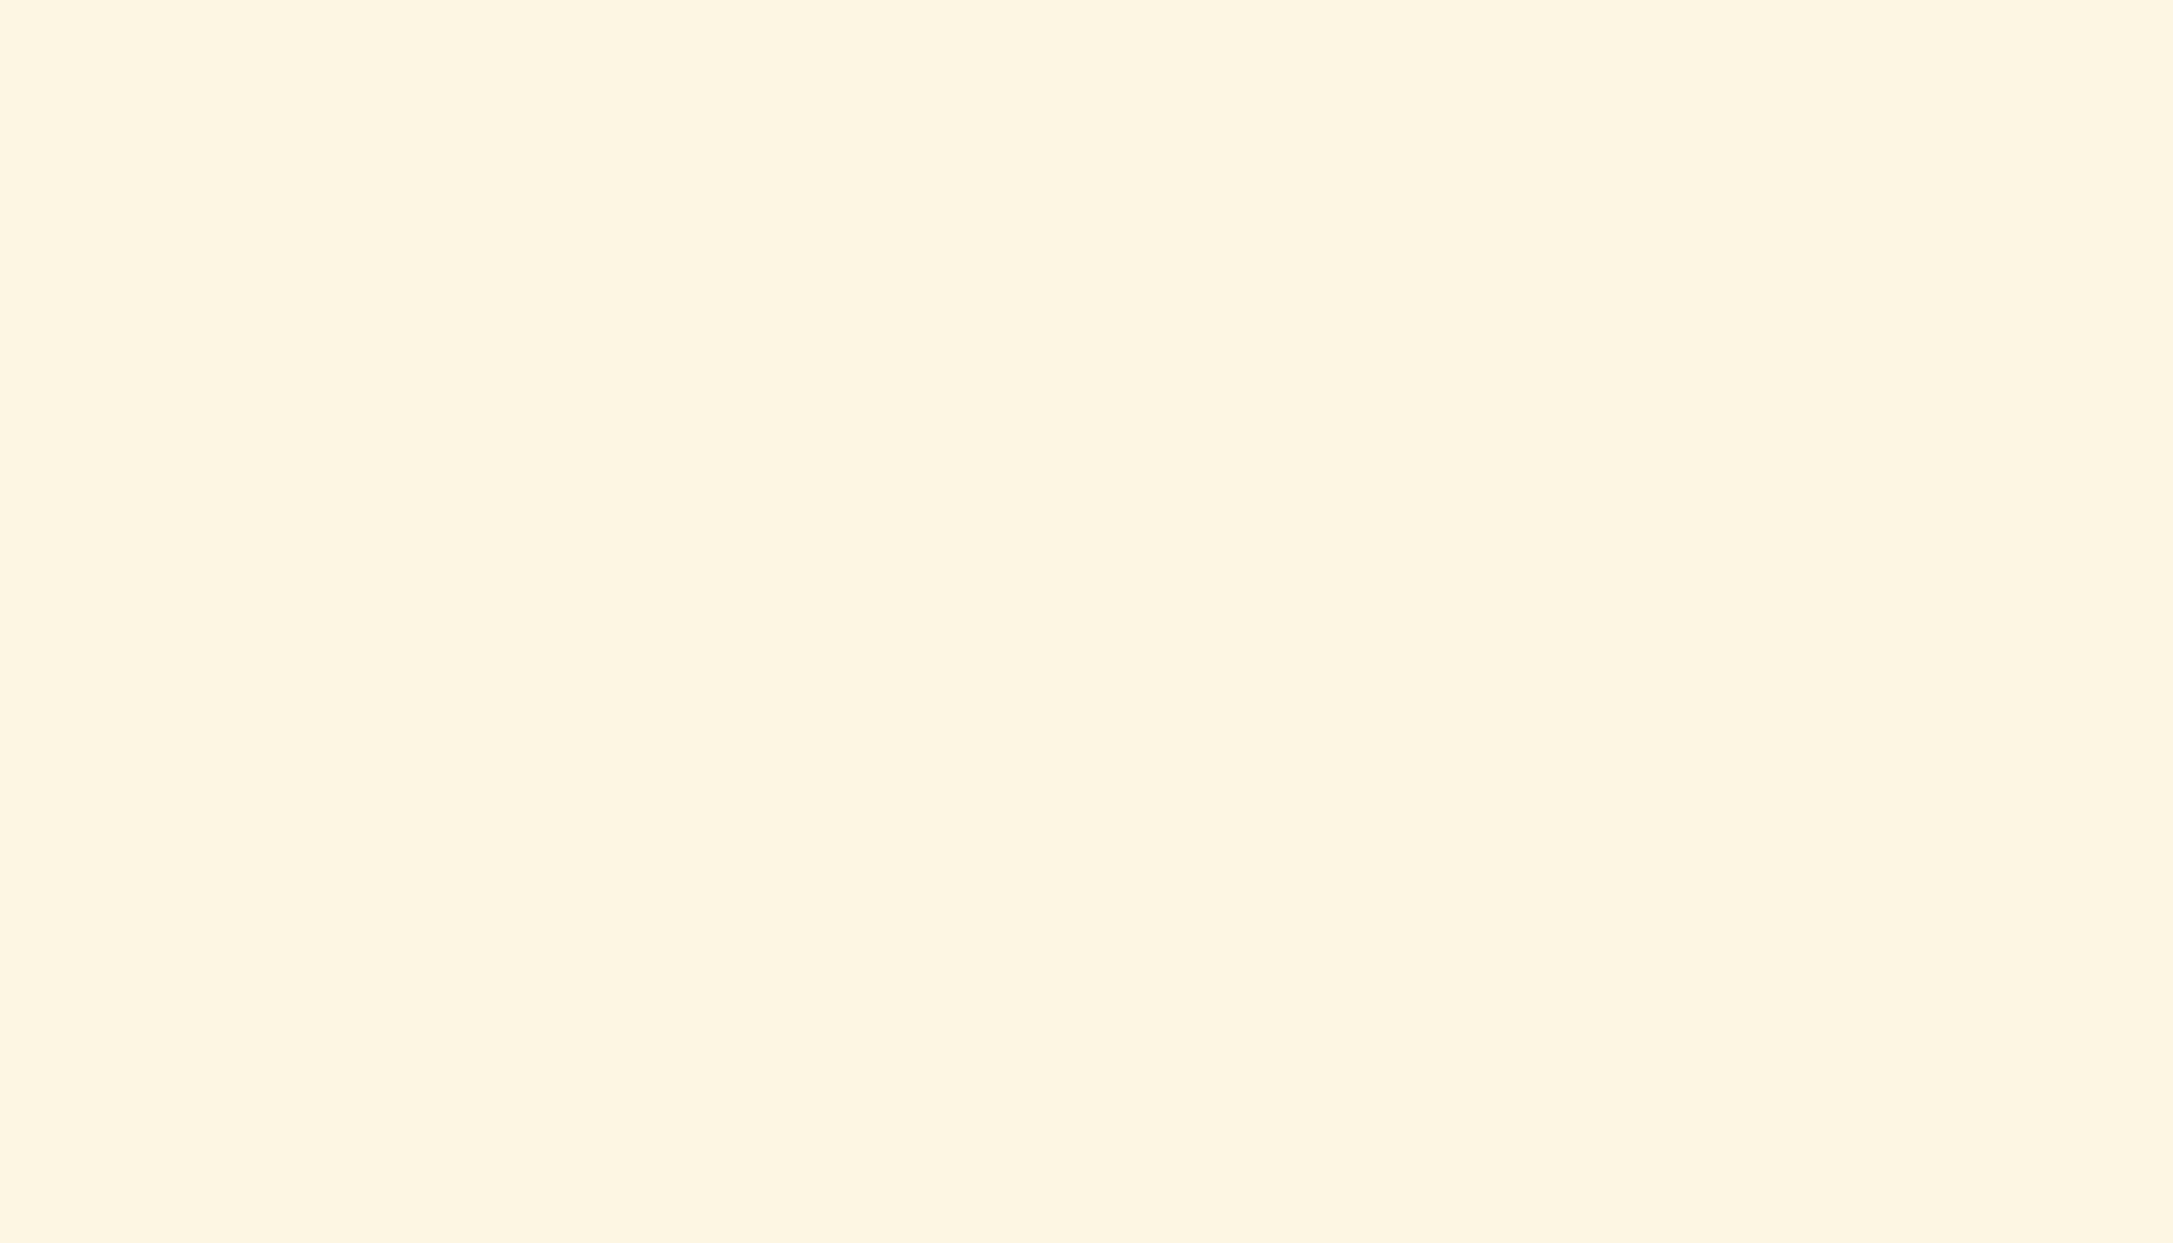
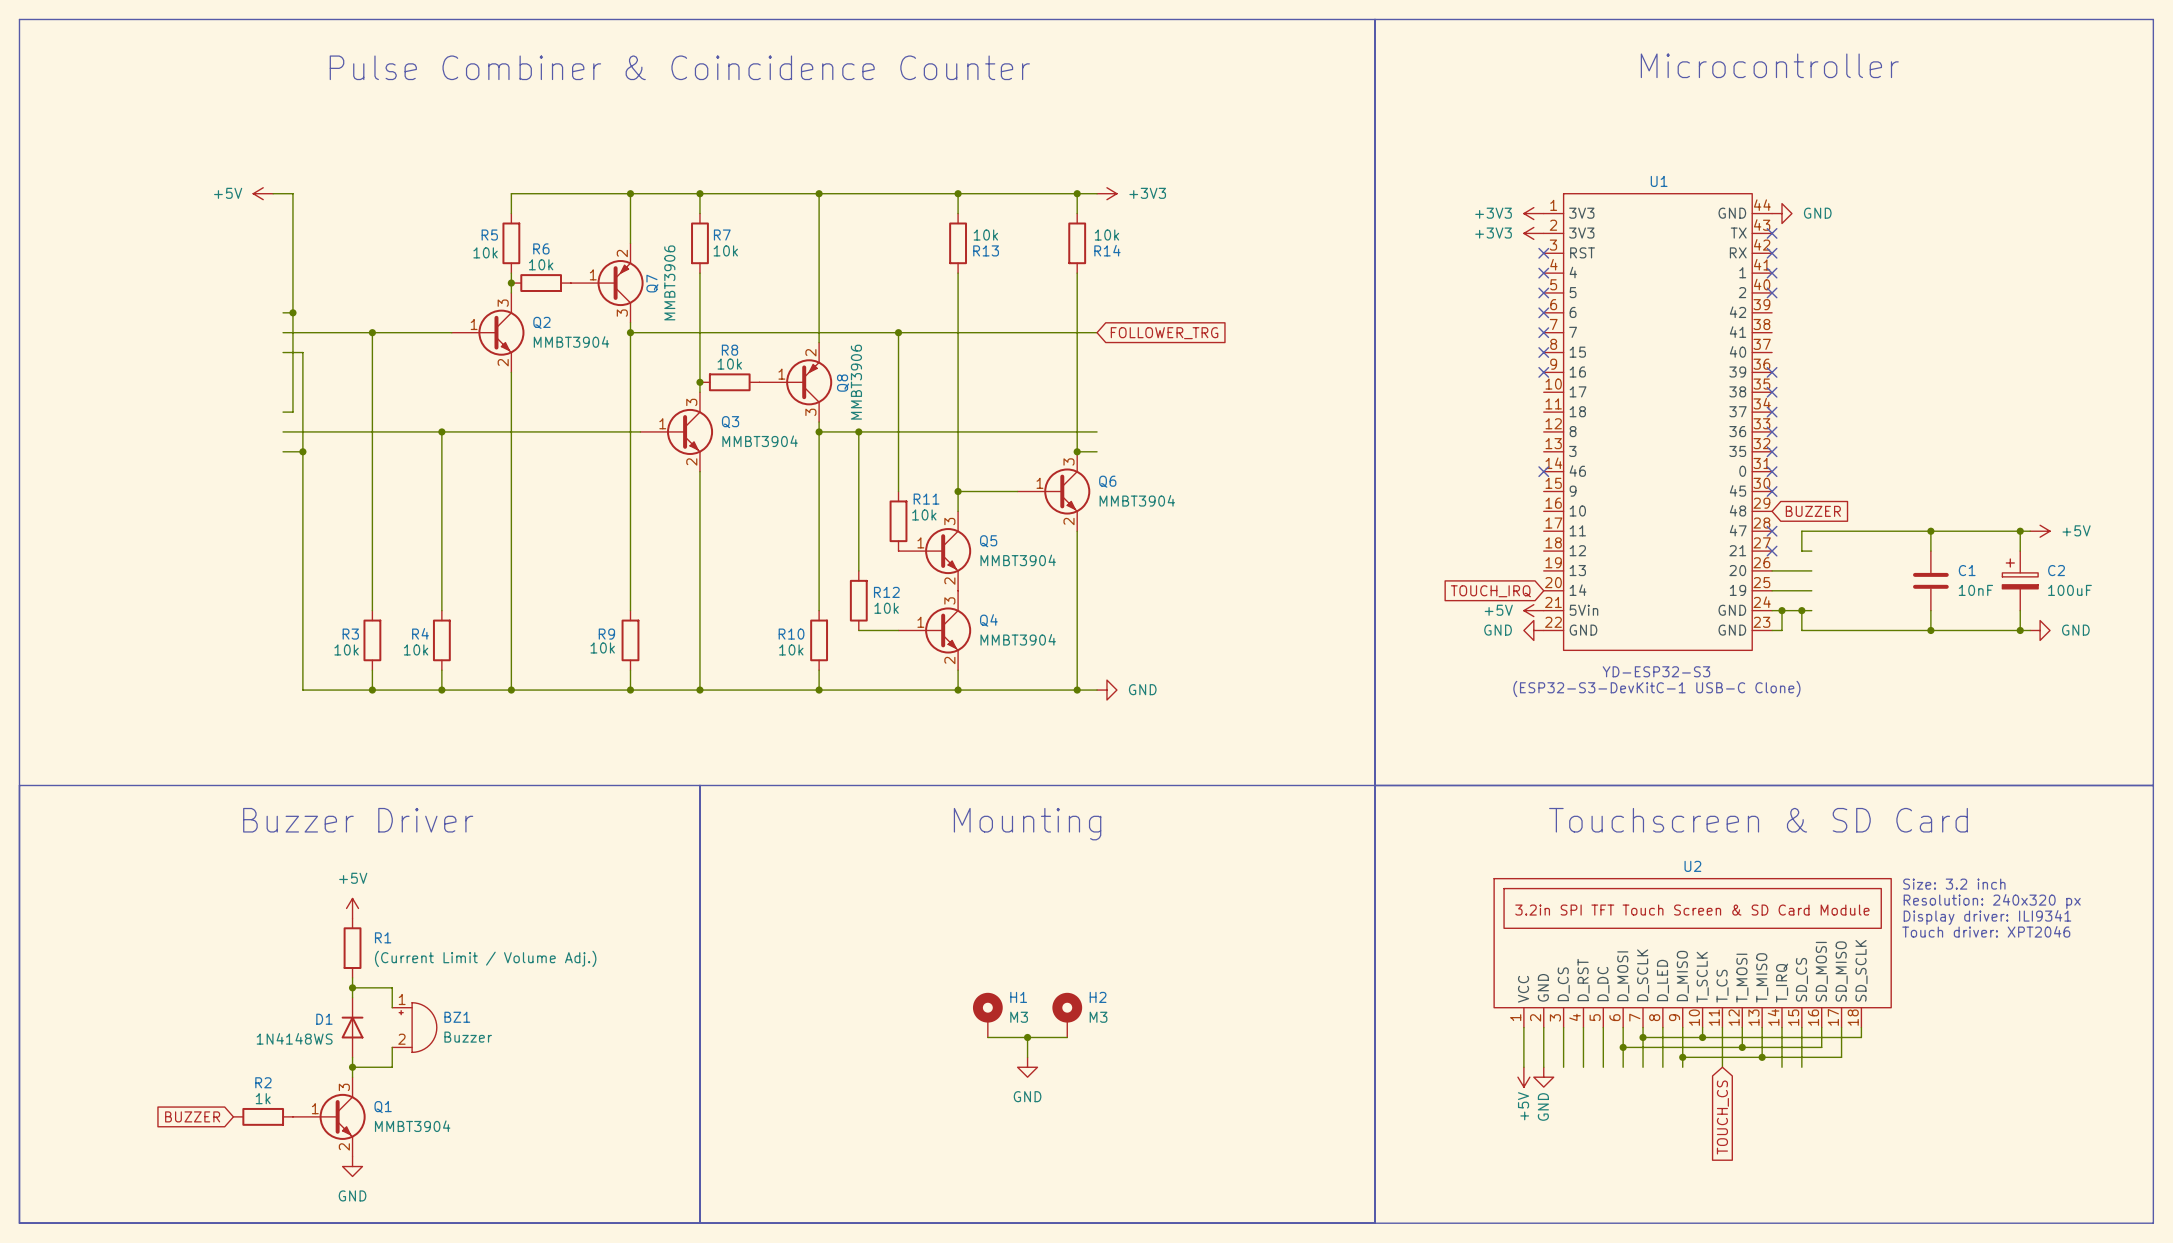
line: none -> (19, 19) (2153, 19) (2153, 1223) (19, 1223) (19, 19)
line: none -> (1374, 19) (1374, 1223)
text: none -> Microcontroller (1769, 65)
text: none -> Pulse Combiner & Coincidence Counter (679, 67)
power symbol: none -> +5V (263, 193)
wire: none -> (273, 193) (292, 193) (292, 412) (283, 412)
wire: none -> (630, 193) (630, 243)
junction: none -> (630, 193)
wire: none -> (699, 193) (699, 213)
junction: none -> (699, 193)
wire: none -> (819, 193) (819, 342)
junction: none -> (819, 193)
wire: none -> (958, 193) (958, 213)
junction: none -> (958, 193)
wire: none -> (1077, 193) (1077, 213)
junction: none -> (1077, 193)
wire: none -> (1097, 193) (511, 193) (511, 213)
power symbol: none -> +3V3 (1106, 193)
power symbol: none -> +3V3 (1533, 213)
power symbol: none -> GND (1781, 213)
power symbol: none -> +3V3 (1533, 233)
no-connect mark: none -> (1772, 233)
R5: none -> 10k (511, 243)
R7: none -> 10k (699, 243)
R13: none -> 10k (958, 243)
R14: none -> 10k (1077, 243)
no-connect mark: none -> (1543, 253)
no-connect mark: none -> (1772, 253)
wire: none -> (511, 273) (511, 292)
wire: none -> (699, 273) (699, 392)
wire: none -> (958, 273) (958, 511)
wire: none -> (1077, 273) (1077, 451) (1097, 451)
no-connect mark: none -> (1543, 273)
no-connect mark: none -> (1772, 273)
junction: none -> (511, 283)
R6: none -> 10k (541, 283)
Q7: none -> MMBT3906 (607, 283)
no-connect mark: none -> (1543, 292)
no-connect mark: none -> (1772, 292)
wire: none -> (283, 312) (292, 312)
junction: none -> (292, 312)
no-connect mark: none -> (1543, 312)
wire: none -> (630, 322) (630, 610)
wire: none -> (283, 332) (451, 332)
wire: none -> (372, 332) (372, 610)
junction: none -> (372, 332)
Q2: none -> MMBT3904 (488, 332)
wire: none -> (630, 332) (1097, 332)
junction: none -> (630, 332)
wire: none -> (898, 332) (898, 491)
junction: none -> (898, 332)
no-connect mark: none -> (1543, 332)
global label: none -> FOLLOWER_TRG (1164, 333)
wire: none -> (283, 352) (302, 352) (302, 690) (1097, 690)
no-connect mark: none -> (1543, 352)
wire: none -> (511, 372) (511, 690)
no-connect mark: none -> (1543, 372)
no-connect mark: none -> (1772, 372)
junction: none -> (699, 382)
R8: none -> 10k (729, 382)
Q8: none -> MMBT3906 (795, 382)
no-connect mark: none -> (1772, 392)
no-connect mark: none -> (1772, 412)
wire: none -> (819, 422) (819, 610)
U1: none -> (1657, 422)
wire: none -> (283, 431) (640, 431)
wire: none -> (441, 431) (441, 610)
junction: none -> (441, 431)
Q3: none -> MMBT3904 (676, 431)
wire: none -> (819, 431) (1097, 431)
junction: none -> (819, 431)
wire: none -> (858, 431) (858, 570)
junction: none -> (858, 431)
no-connect mark: none -> (1772, 431)
wire: none -> (283, 451) (302, 451)
junction: none -> (302, 451)
junction: none -> (1077, 451)
no-connect mark: none -> (1772, 451)
wire: none -> (699, 471) (699, 690)
no-connect mark: none -> (1543, 471)
no-connect mark: none -> (1772, 471)
wire: none -> (958, 491) (1017, 491)
junction: none -> (958, 491)
Q6: none -> MMBT3904 (1053, 491)
no-connect mark: none -> (1772, 491)
global label: none -> BUZZER (1813, 511)
R11: none -> 10k (898, 521)
wire: none -> (1077, 531) (1077, 690)
no-connect mark: none -> (1772, 531)
wire: none -> (1930, 531) (1930, 551)
junction: none -> (1930, 531)
wire: none -> (2020, 531) (2020, 551)
junction: none -> (2020, 531)
wire: none -> (2030, 531) (1801, 531) (1801, 551) (1811, 551)
power symbol: none -> +5V (2040, 531)
Q5: none -> MMBT3904 (934, 551)
no-connect mark: none -> (1772, 551)
wire: none -> (1772, 570) (1811, 570)
C1: none -> 10nF (1930, 580)
C2: none -> 100uF (2020, 580)
wire: none -> (1772, 590) (1811, 590)
global label: none -> TOUCH_IRQ (1490, 591)
R12: none -> 10k (858, 600)
power symbol: none -> +5V (1533, 610)
wire: none -> (1772, 610) (1811, 610)
wire: none -> (1781, 610) (1781, 630) (1772, 630)
junction: none -> (1781, 610)
wire: none -> (1801, 610) (1801, 630) (2030, 630)
junction: none -> (1801, 610)
wire: none -> (1930, 610) (1930, 630)
wire: none -> (2020, 610) (2020, 630)
wire: none -> (858, 630) (898, 630)
Q4: none -> MMBT3904 (934, 630)
power symbol: none -> GND (1533, 630)
junction: none -> (1930, 630)
junction: none -> (2020, 630)
power symbol: none -> GND (2040, 630)
R3: none -> 10k (372, 640)
R4: none -> 10k (441, 640)
R9: none -> 10k (630, 640)
R10: none -> 10k (819, 640)
wire: none -> (372, 670) (372, 690)
wire: none -> (441, 670) (441, 690)
wire: none -> (630, 670) (630, 690)
wire: none -> (819, 670) (819, 690)
wire: none -> (958, 670) (958, 690)
text: none -> YD-ESP32-S3 (1656, 671)
text: none -> (ESP32-S3-DevKitC-1 USB-C Clone) (1656, 688)
junction: none -> (372, 690)
junction: none -> (441, 690)
junction: none -> (511, 690)
junction: none -> (630, 690)
junction: none -> (699, 690)
junction: none -> (819, 690)
junction: none -> (958, 690)
junction: none -> (1077, 690)
power symbol: none -> GND (1106, 690)
line: none -> (19, 785) (2153, 785)
line: none -> (699, 785) (699, 1223)
text: none -> Buzzer Driver (358, 820)
text: none -> Touchscreen & SD Card (1758, 820)
text: none -> Mounting (1027, 824)
text: none -> Size: 3.2 inch (1954, 884)
text: none -> Resolution: 240x320 px (1992, 901)
power symbol: none -> +5V (352, 908)
text: none -> Display driver: ILI9341 (1987, 917)
text: none -> Touch driver: XPT2046 (1986, 931)
R1: none -> (Current Limit / Volume Adj.) (352, 948)
U2: none -> (1692, 953)
wire: none -> (352, 977) (352, 997)
wire: none -> (352, 987) (392, 987) (392, 1007)
junction: none -> (352, 987)
H1: none -> M3 (987, 1015)
H2: none -> M3 (1067, 1015)
D1: none -> 1N4148WS (352, 1027)
BZ1: none -> Buzzer (414, 1027)
wire: none -> (1523, 1027) (1523, 1067)
wire: none -> (1543, 1027) (1543, 1067)
wire: none -> (1563, 1027) (1563, 1067)
wire: none -> (1583, 1027) (1583, 1067)
wire: none -> (1603, 1027) (1603, 1067)
wire: none -> (1623, 1027) (1623, 1067)
wire: none -> (1643, 1027) (1643, 1067)
wire: none -> (1662, 1027) (1662, 1067)
wire: none -> (1682, 1027) (1682, 1067)
wire: none -> (1702, 1027) (1702, 1037)
wire: none -> (1722, 1027) (1722, 1067)
wire: none -> (1742, 1027) (1742, 1047)
wire: none -> (1762, 1027) (1762, 1057)
wire: none -> (1781, 1027) (1781, 1067)
wire: none -> (1801, 1027) (1801, 1067)
wire: none -> (1821, 1027) (1821, 1047) (1623, 1047)
wire: none -> (1841, 1027) (1841, 1057) (1682, 1057)
wire: none -> (1861, 1027) (1861, 1037) (1643, 1037)
wire: none -> (987, 1037) (1067, 1037)
wire: none -> (1027, 1037) (1027, 1057)
junction: none -> (1027, 1037)
junction: none -> (1643, 1037)
junction: none -> (1702, 1037)
wire: none -> (392, 1047) (392, 1067) (352, 1067)
junction: none -> (1623, 1047)
junction: none -> (1742, 1047)
wire: none -> (352, 1057) (352, 1077)
junction: none -> (1682, 1057)
junction: none -> (1762, 1057)
junction: none -> (352, 1067)
power symbol: none -> GND (1027, 1067)
power symbol: none -> +5V (1523, 1077)
power symbol: none -> GND (1543, 1077)
global label: none -> BUZZER (192, 1116)
R2: none -> 1k (263, 1116)
Q1: none -> MMBT3904 (329, 1116)
global label: none -> TOUCH_CS (1722, 1117)
power symbol: none -> GND (352, 1166)

